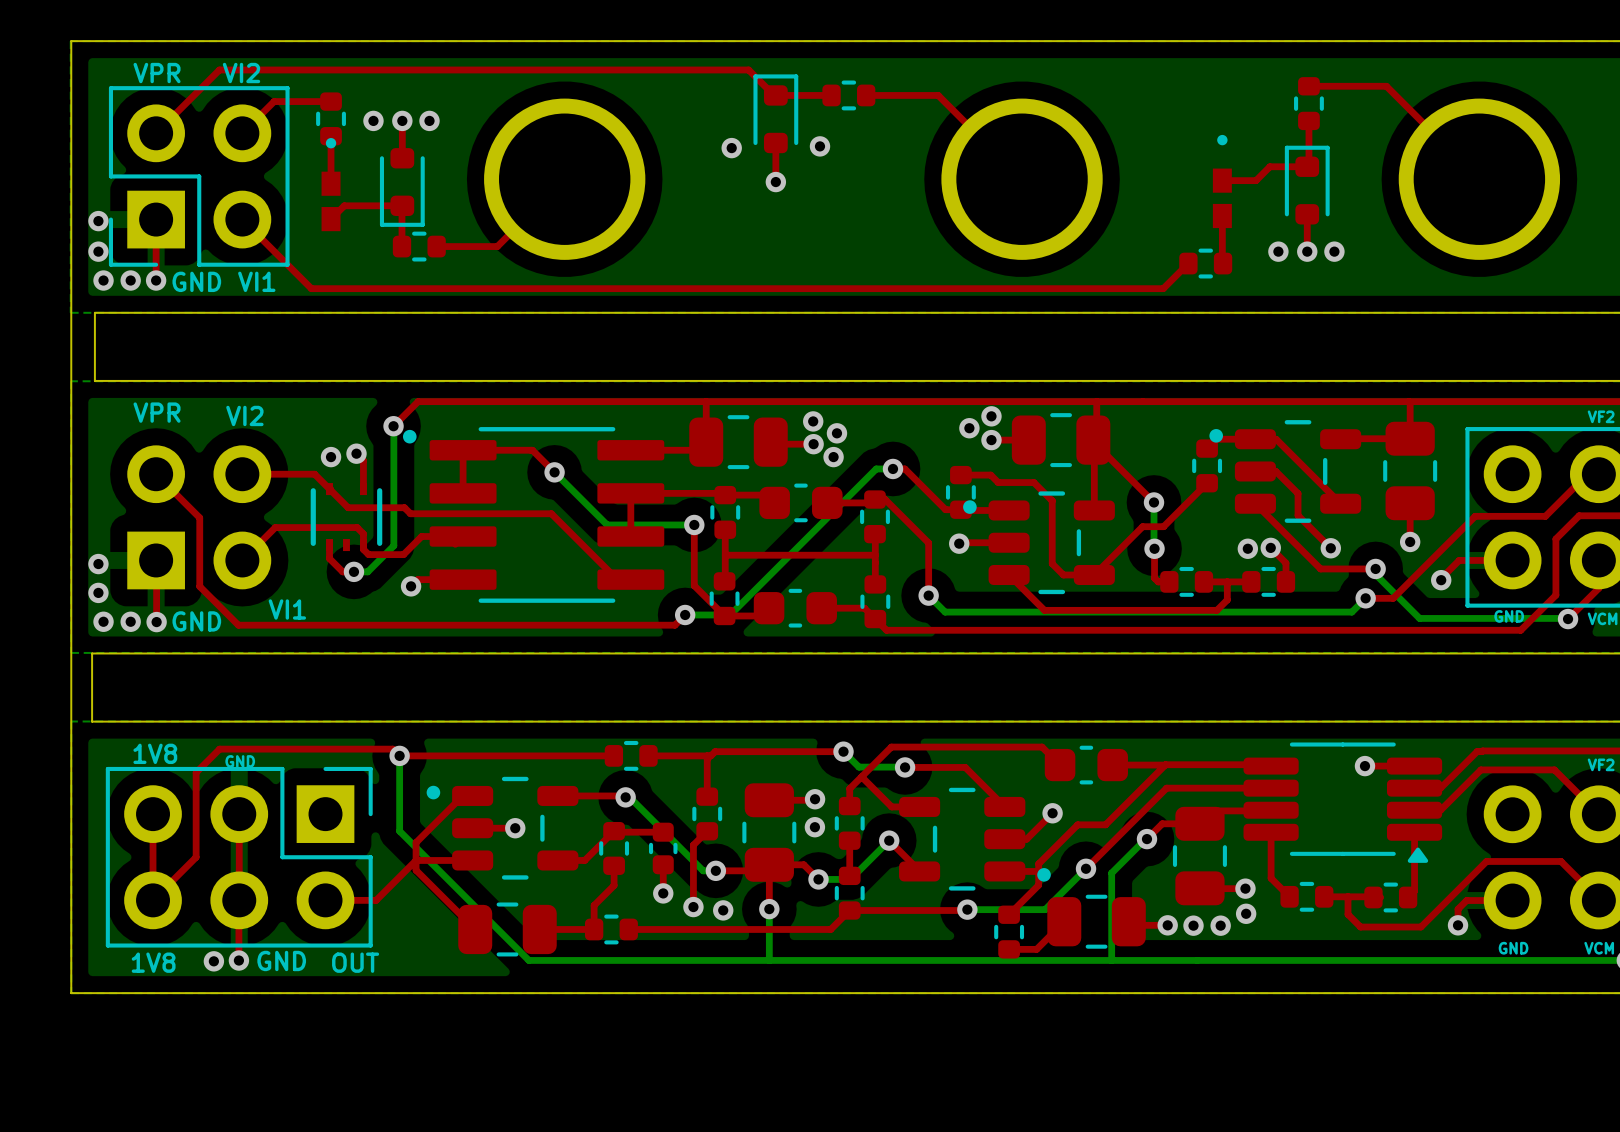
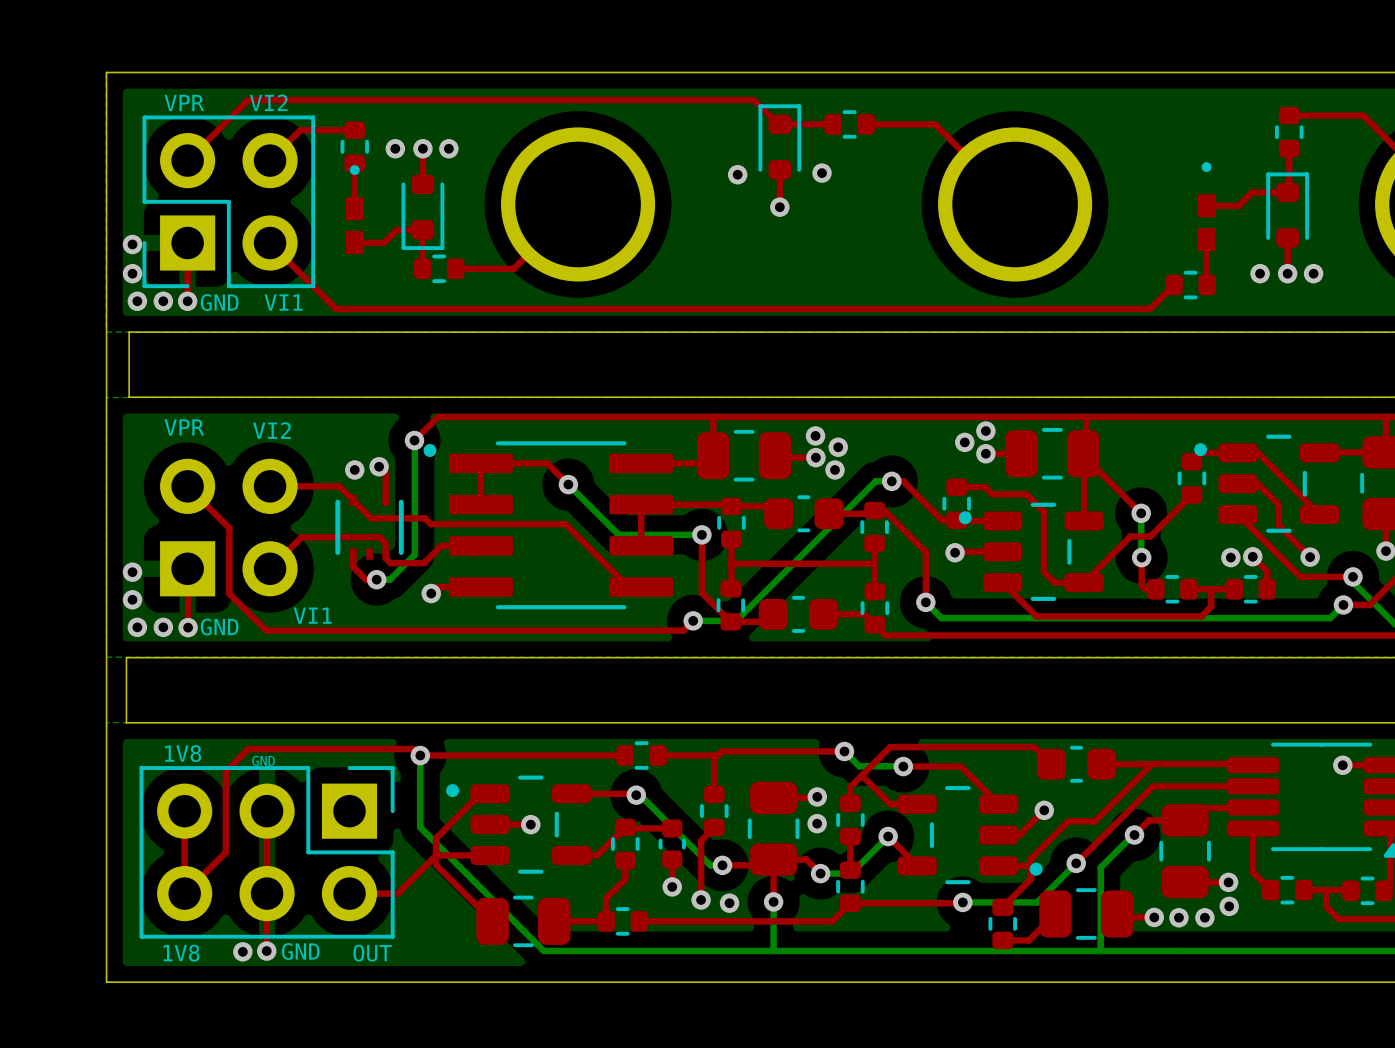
top track: (375, 205) (344, 205) (331, 219) -> (396, 229) (383, 242) (355, 242)

